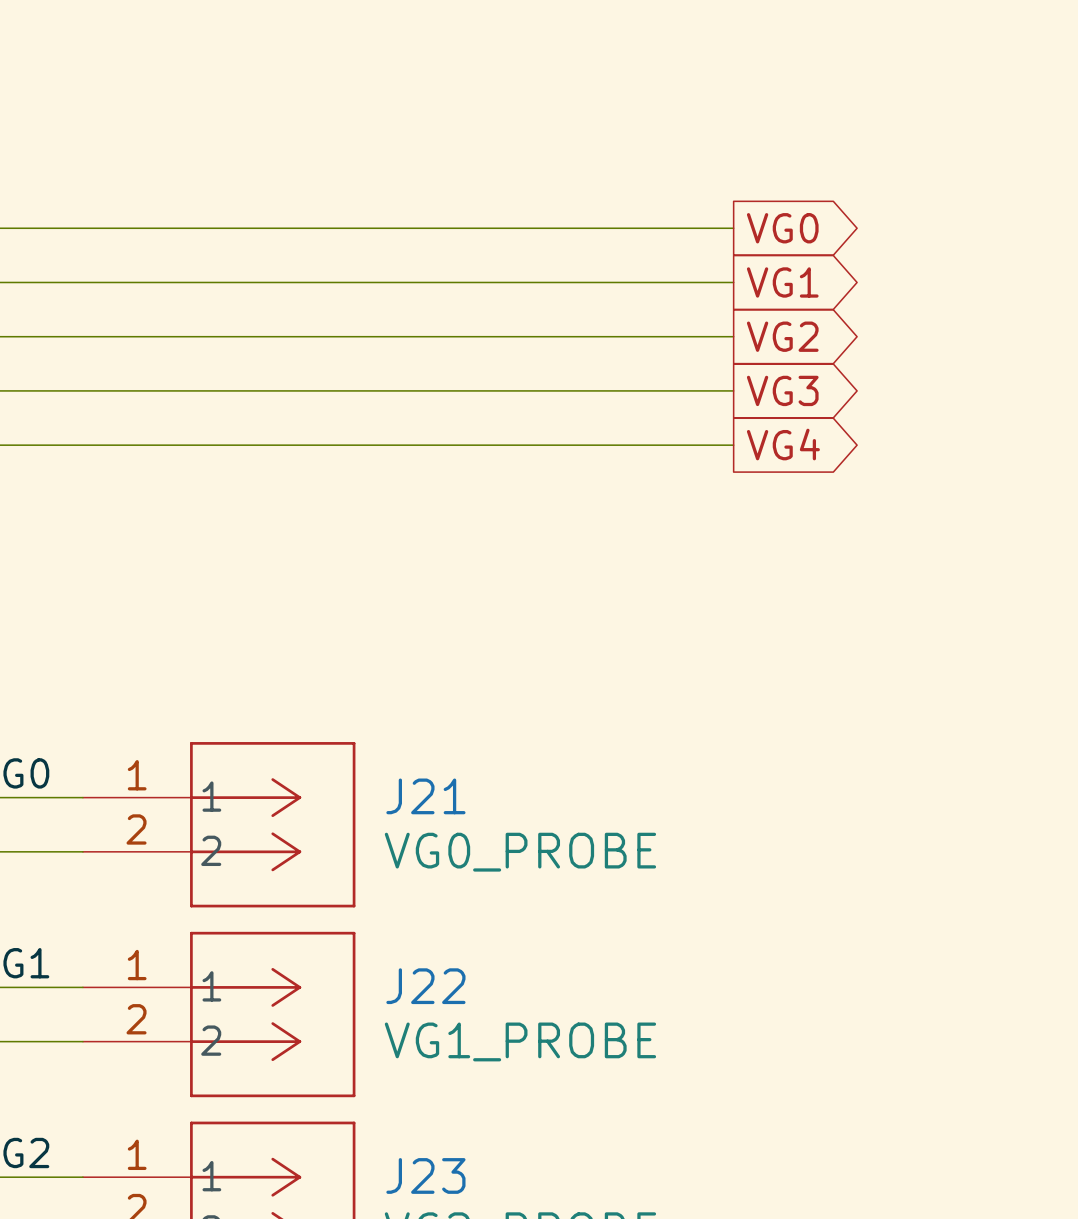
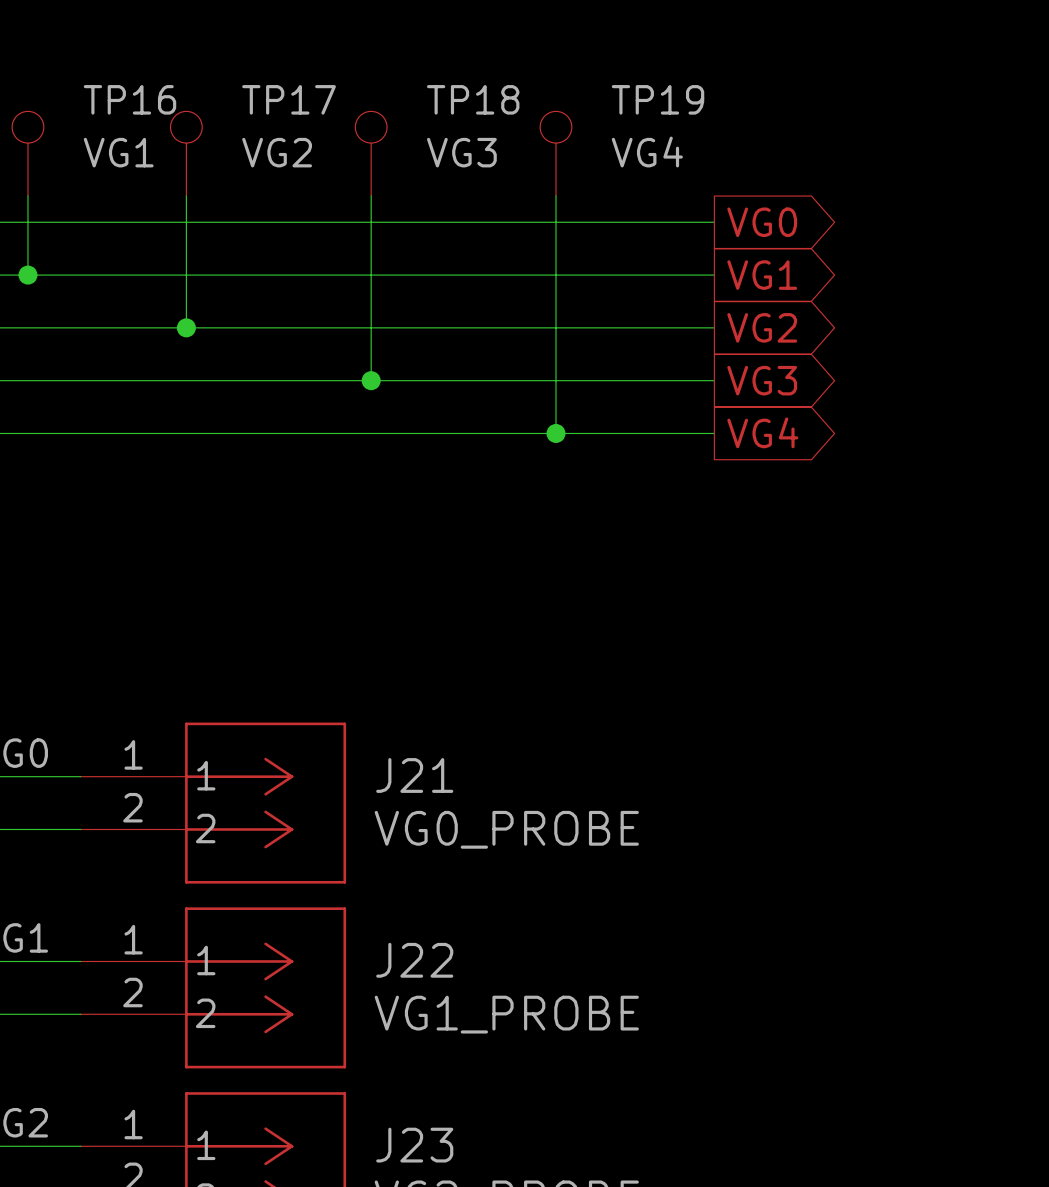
TP16: none -> VG1 (27, 153)
TP17: none -> VG2 (186, 153)
TP18: none -> VG3 (371, 153)
TP19: none -> VG4 (555, 153)
wire: none -> (27, 195) (27, 275)
wire: none -> (186, 195) (186, 327)
wire: none -> (371, 195) (371, 380)
wire: none -> (555, 195) (555, 433)
junction: none -> (27, 275)
junction: none -> (186, 327)
junction: none -> (371, 380)
junction: none -> (555, 433)

